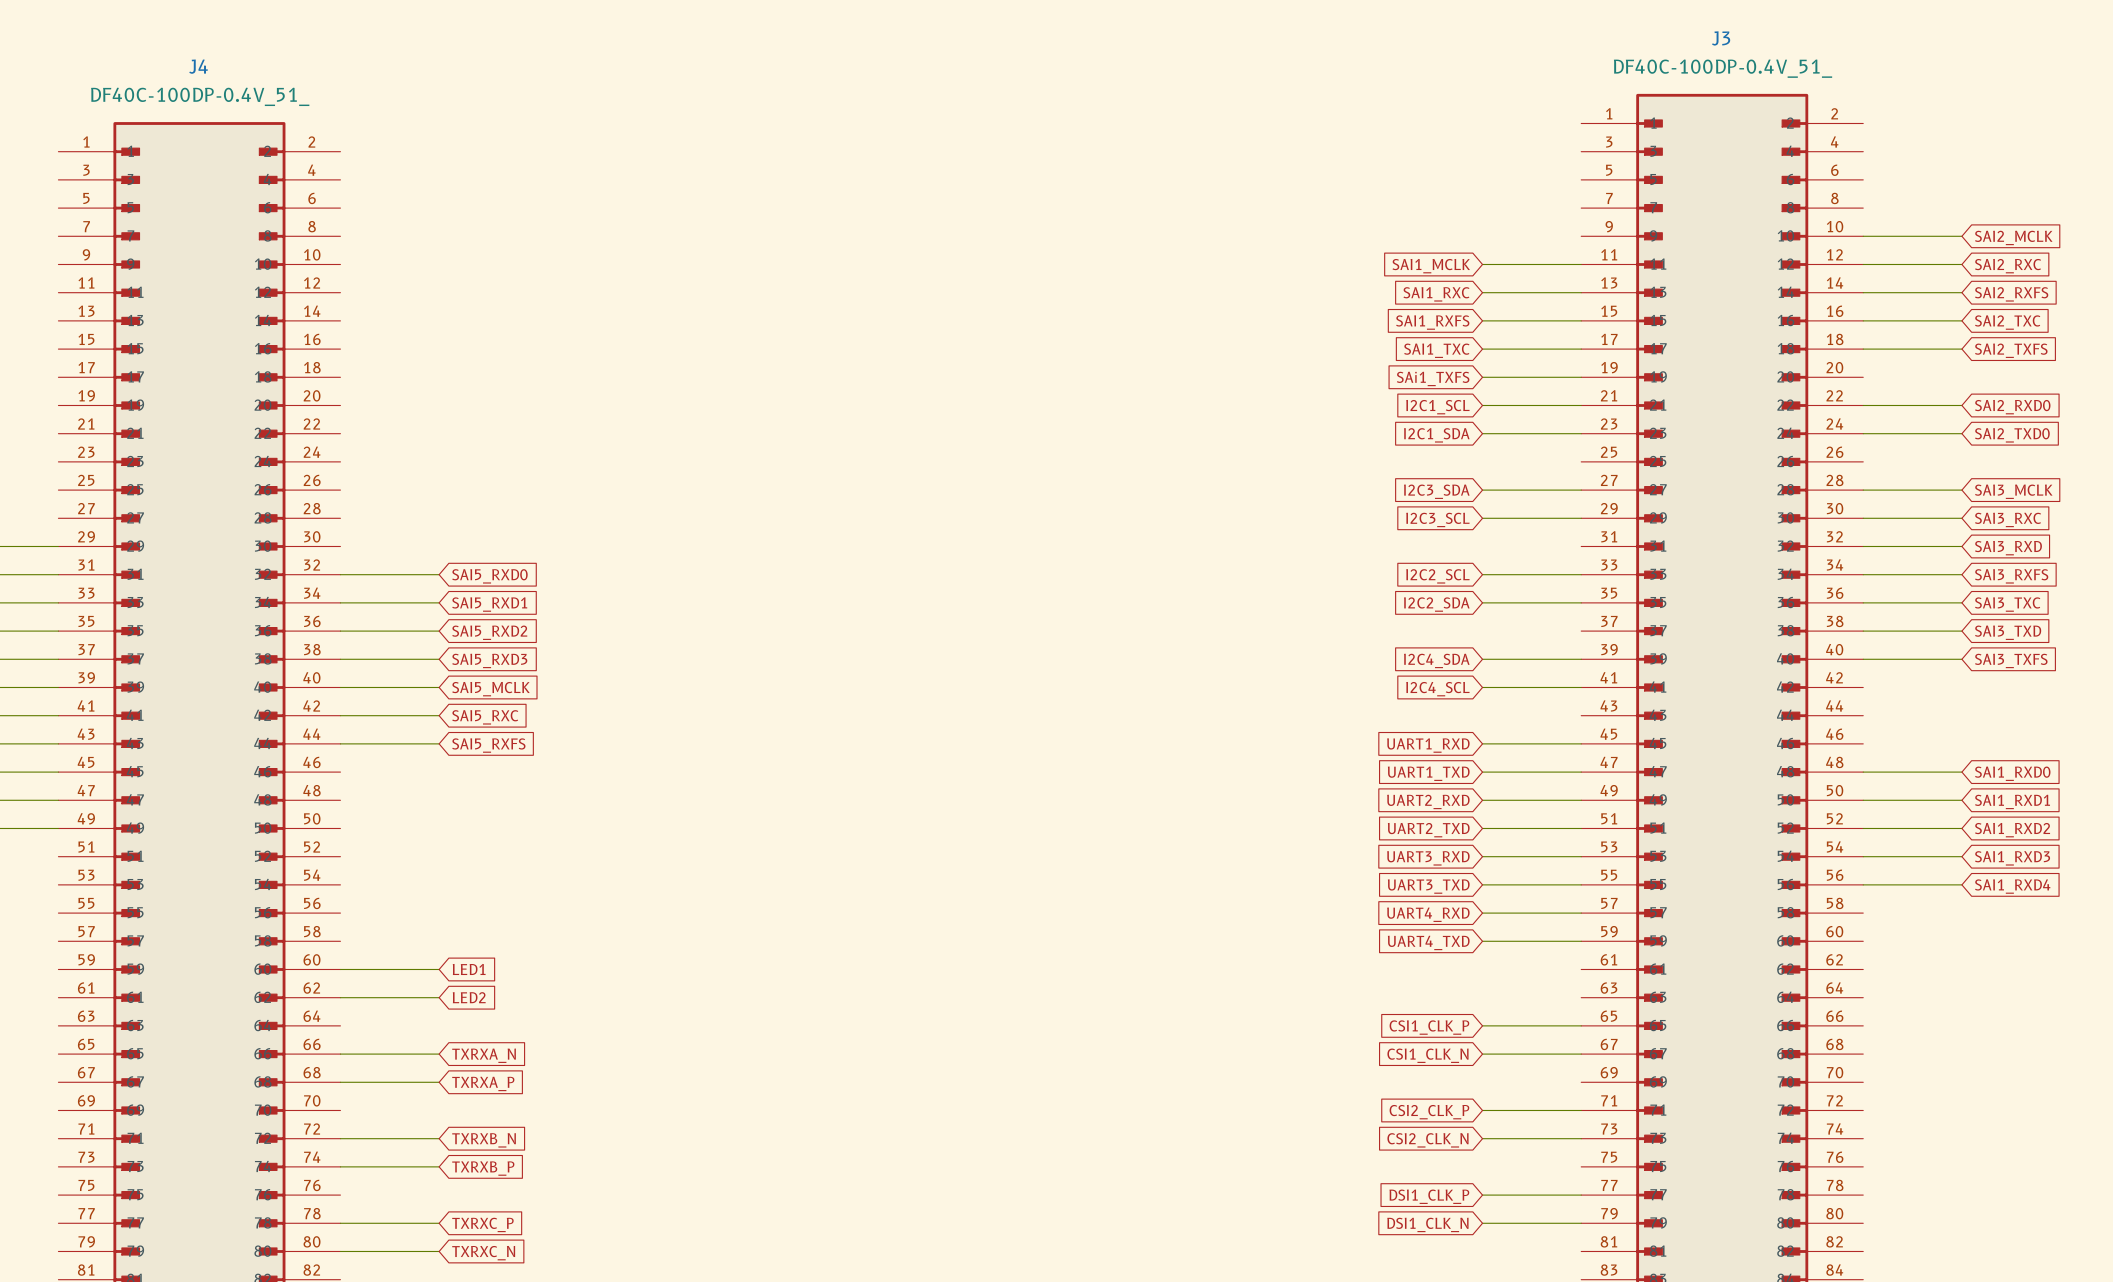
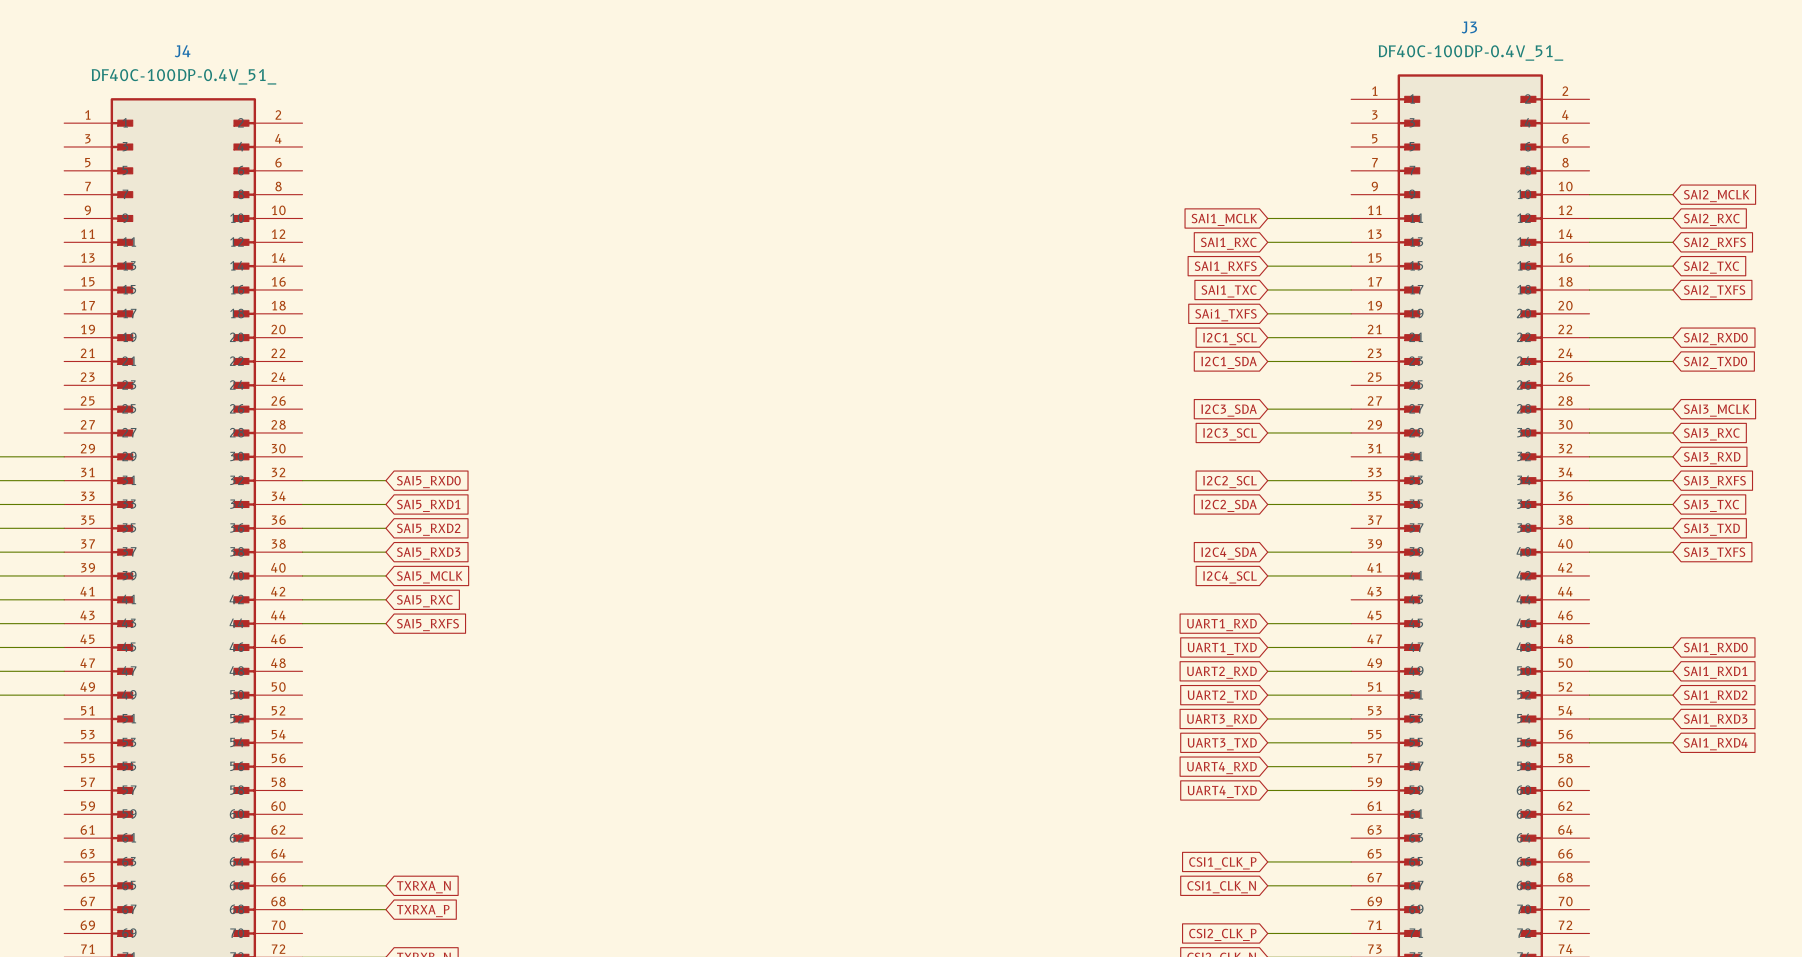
wire: (340, 969) (439, 969) -> none
global label: LED1 (469, 969) -> none
wire: (340, 997) (439, 997) -> none
global label: LED2 (469, 997) -> none

